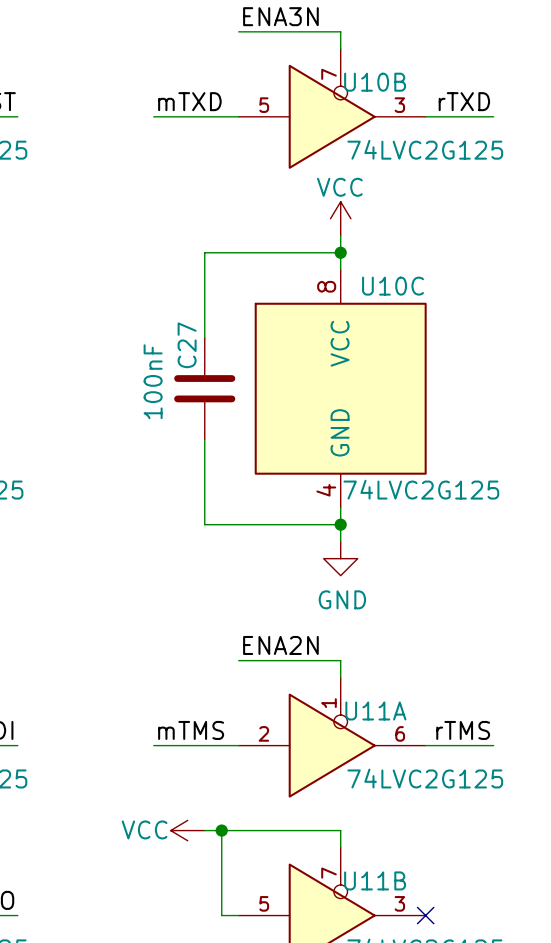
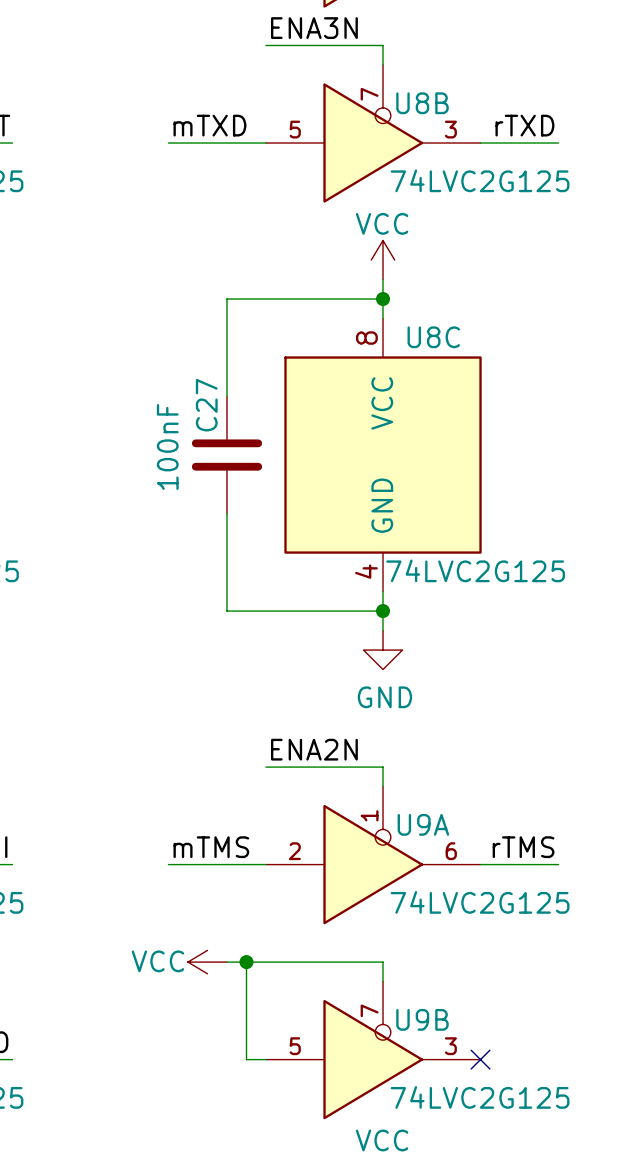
U10B name: U10B (375, 82) -> U8B (422, 103)
U10C name: U10C (393, 286) -> U8C (433, 337)
U11A name: U11A (375, 710) -> U9A (423, 824)
U11B name: U11B (375, 880) -> U9B (422, 1019)

